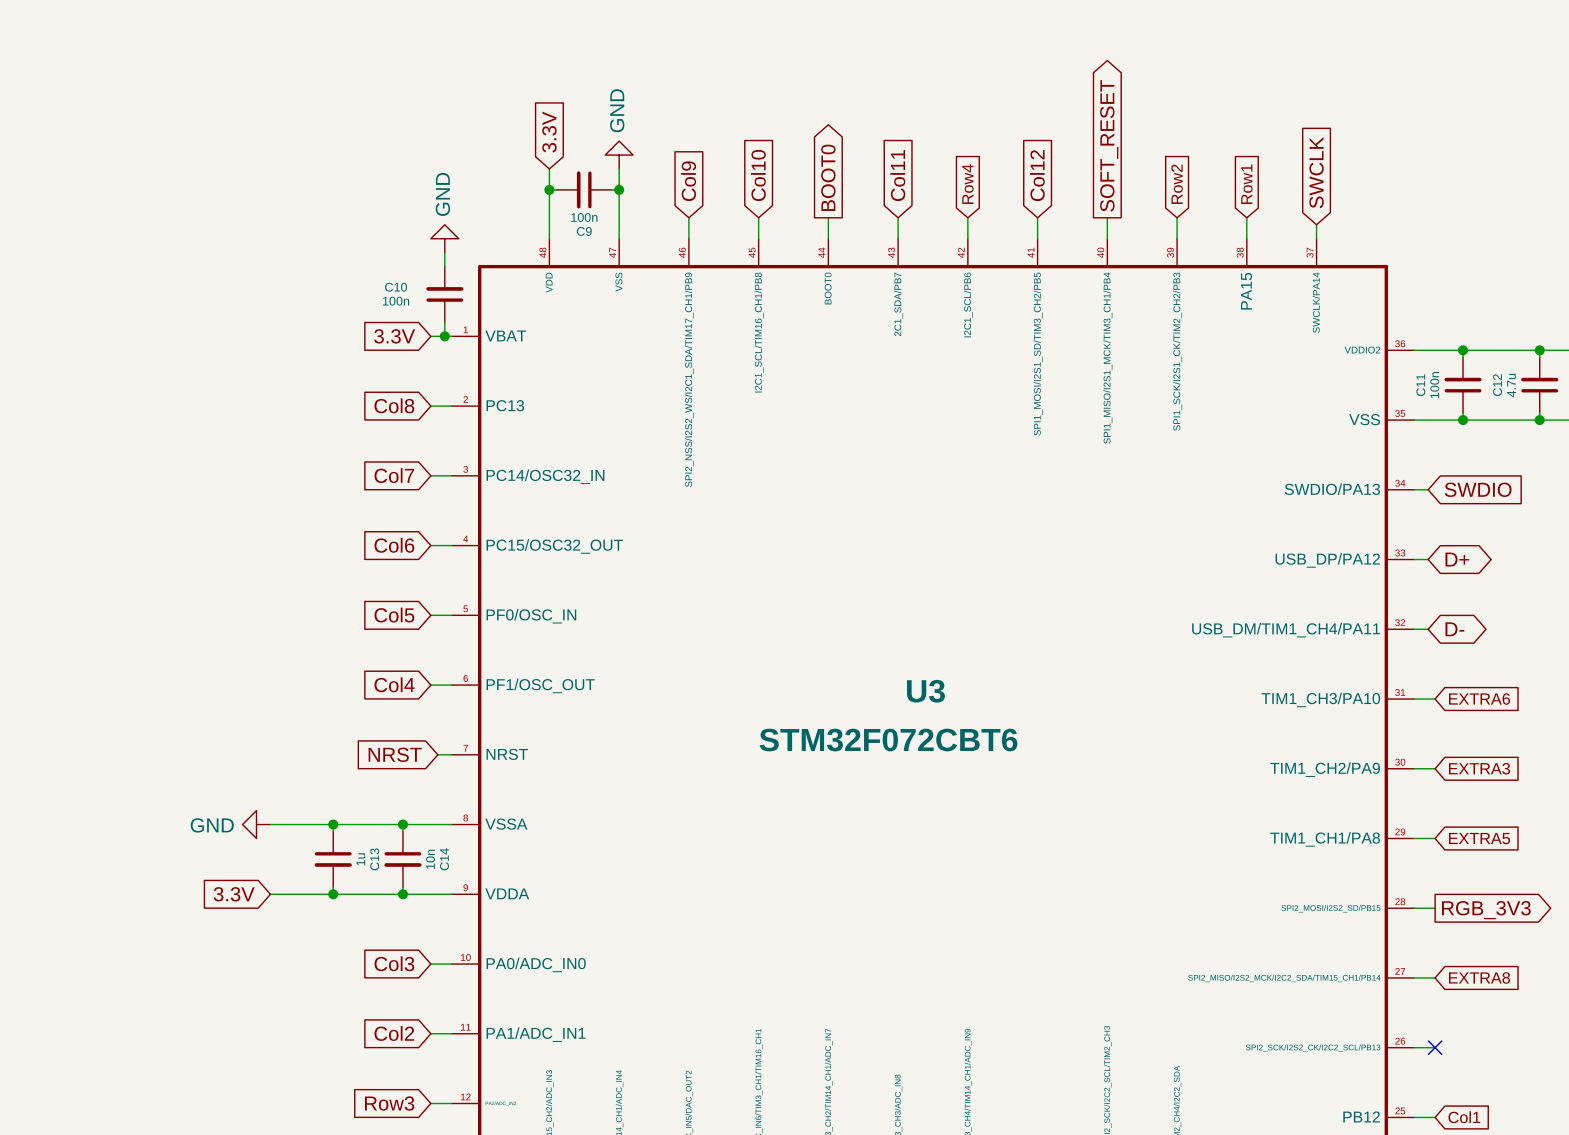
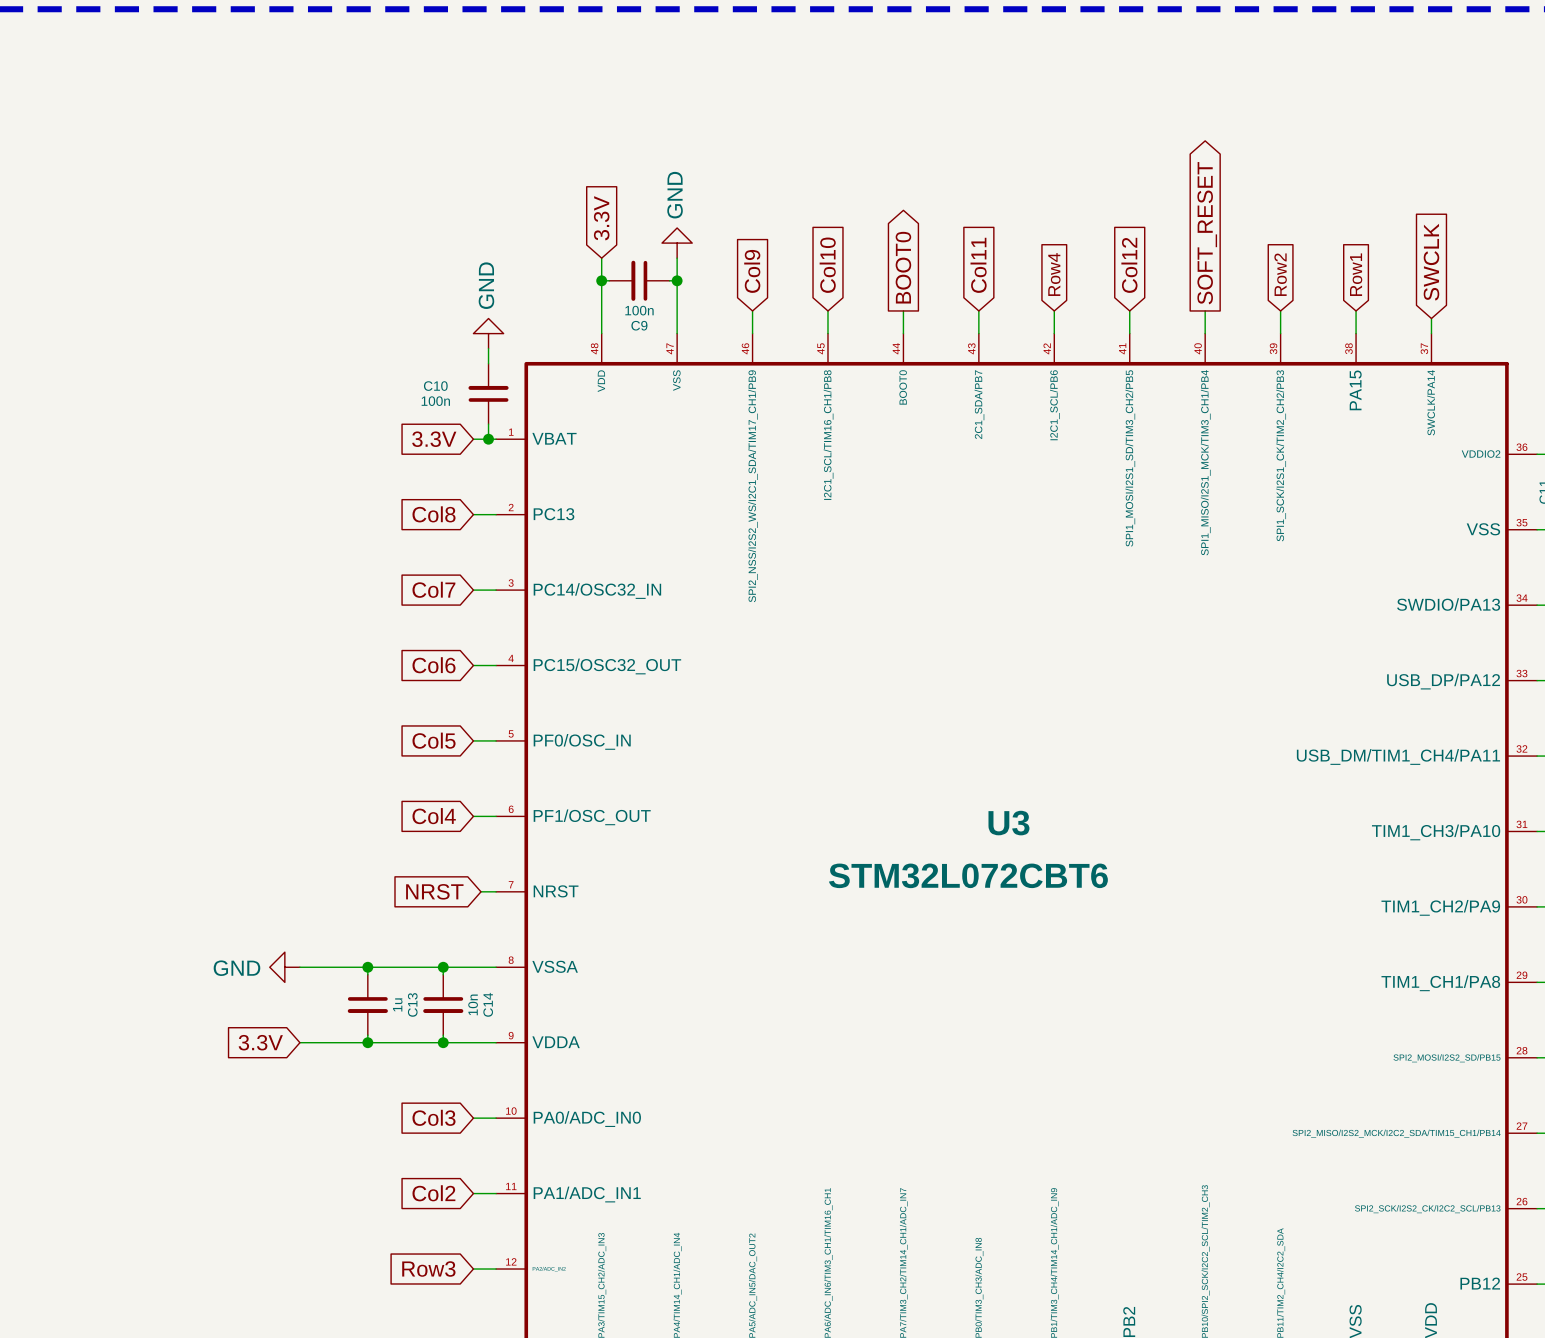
U3 value: STM32F072CBT6 (888, 740) -> STM32L072CBT6 (968, 875)

